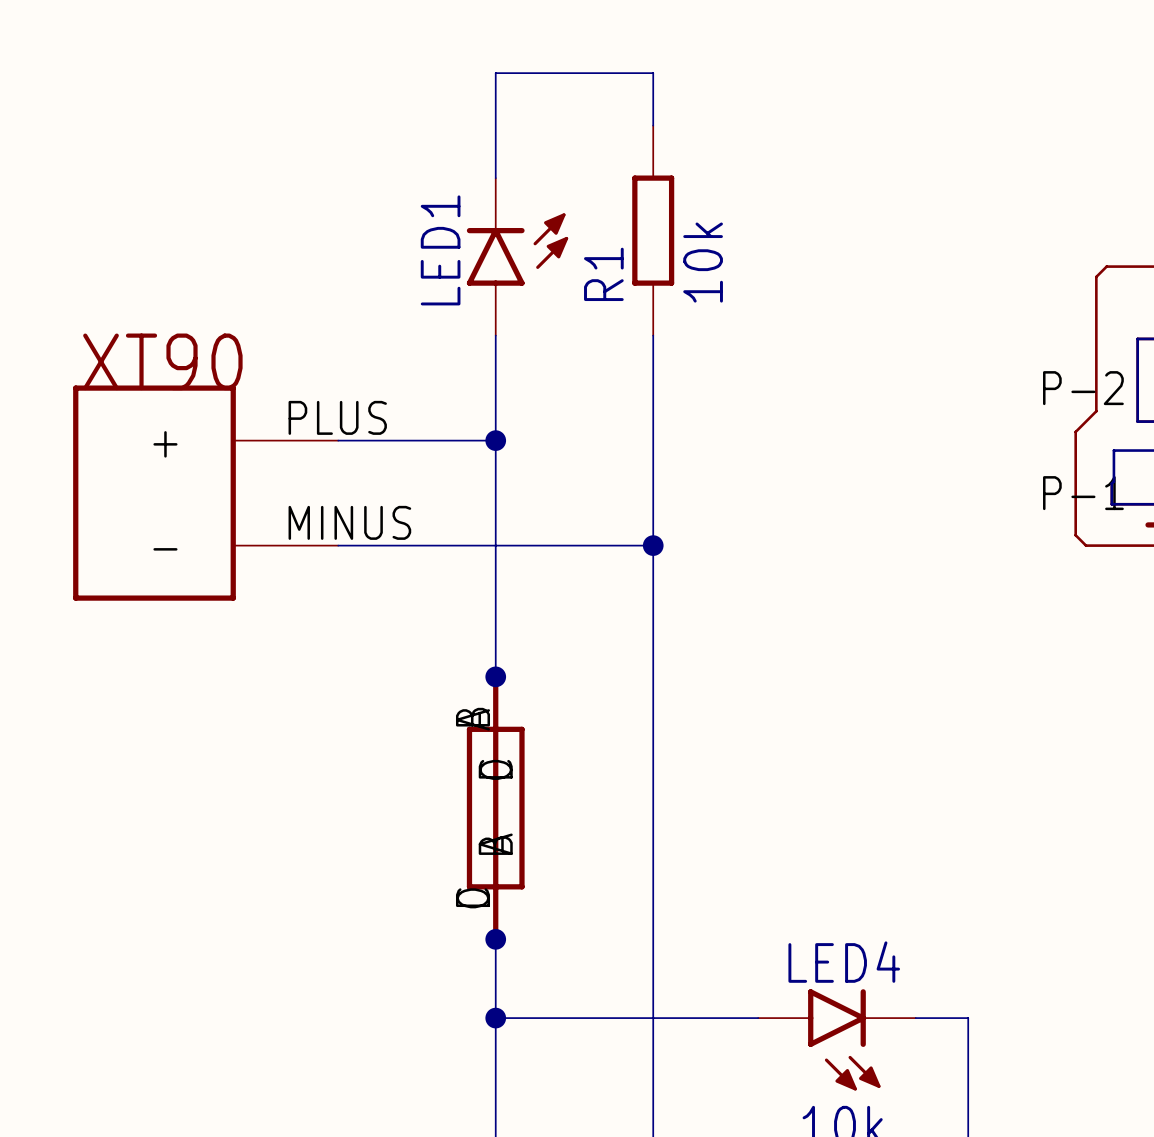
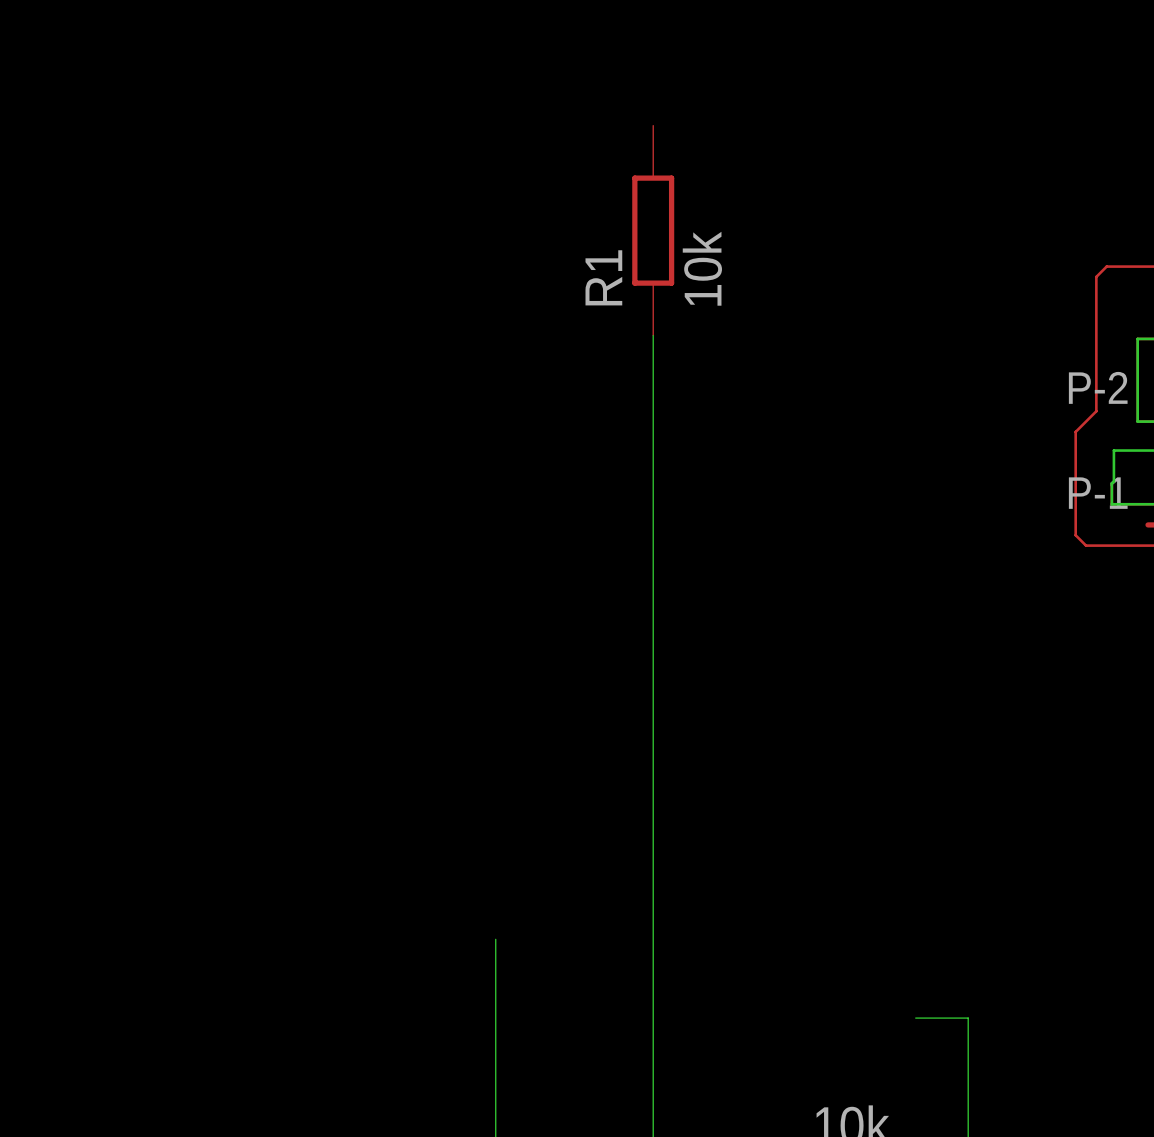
wire: (653, 125) (653, 73) (495, 73) (495, 178) -> none
LED1: (517, 256) -> none
wire: (495, 335) (495, 676) -> none
wire: (338, 440) (495, 440) -> none
junction: (495, 440) -> none
part: (205, 493) -> none
wire: (338, 545) (653, 545) -> none
junction: (653, 545) -> none
junction: (495, 676) -> none
part: (495, 808) -> none
junction: (495, 939) -> none
wire: (495, 1018) (758, 1018) -> none
junction: (495, 1018) -> none
LED4: (836, 1039) -> none

